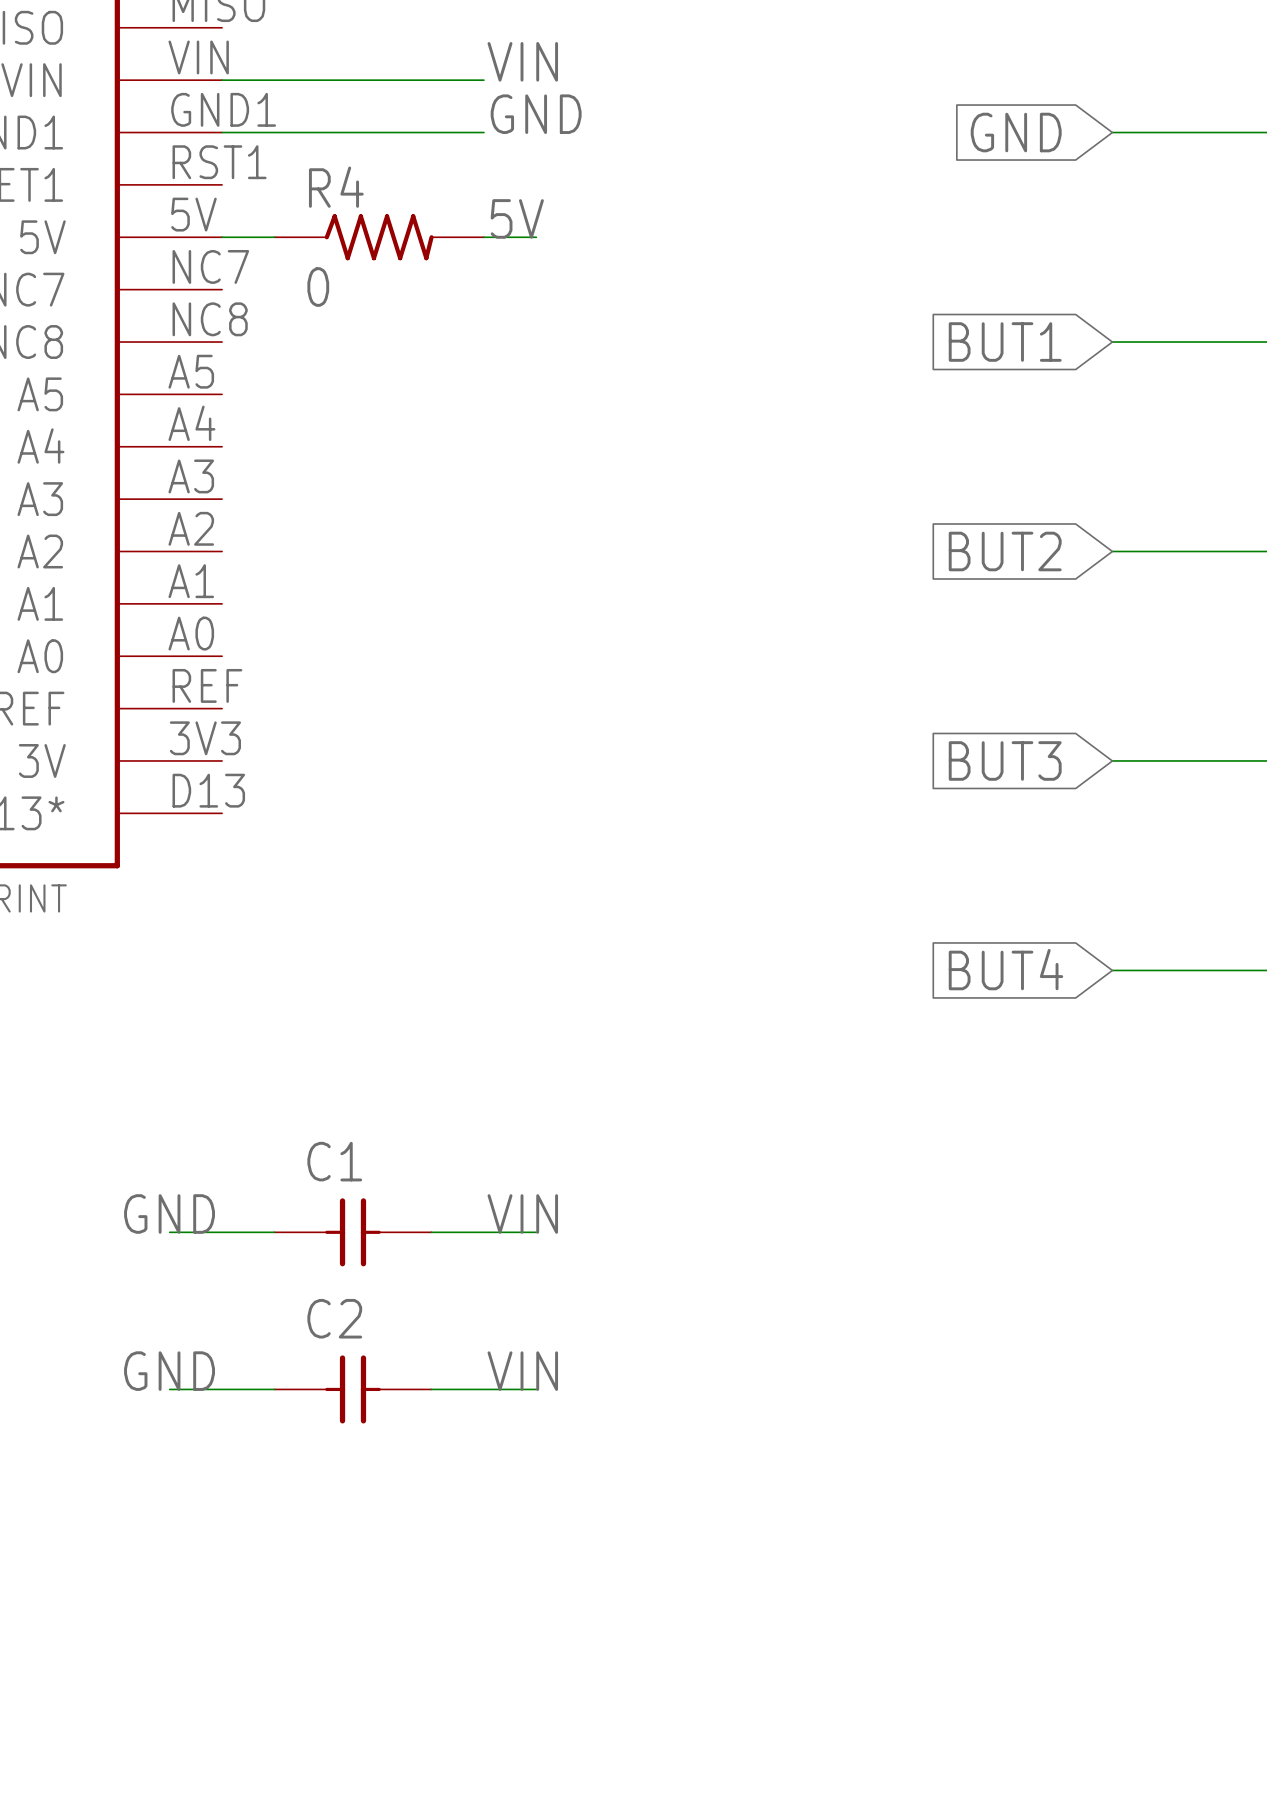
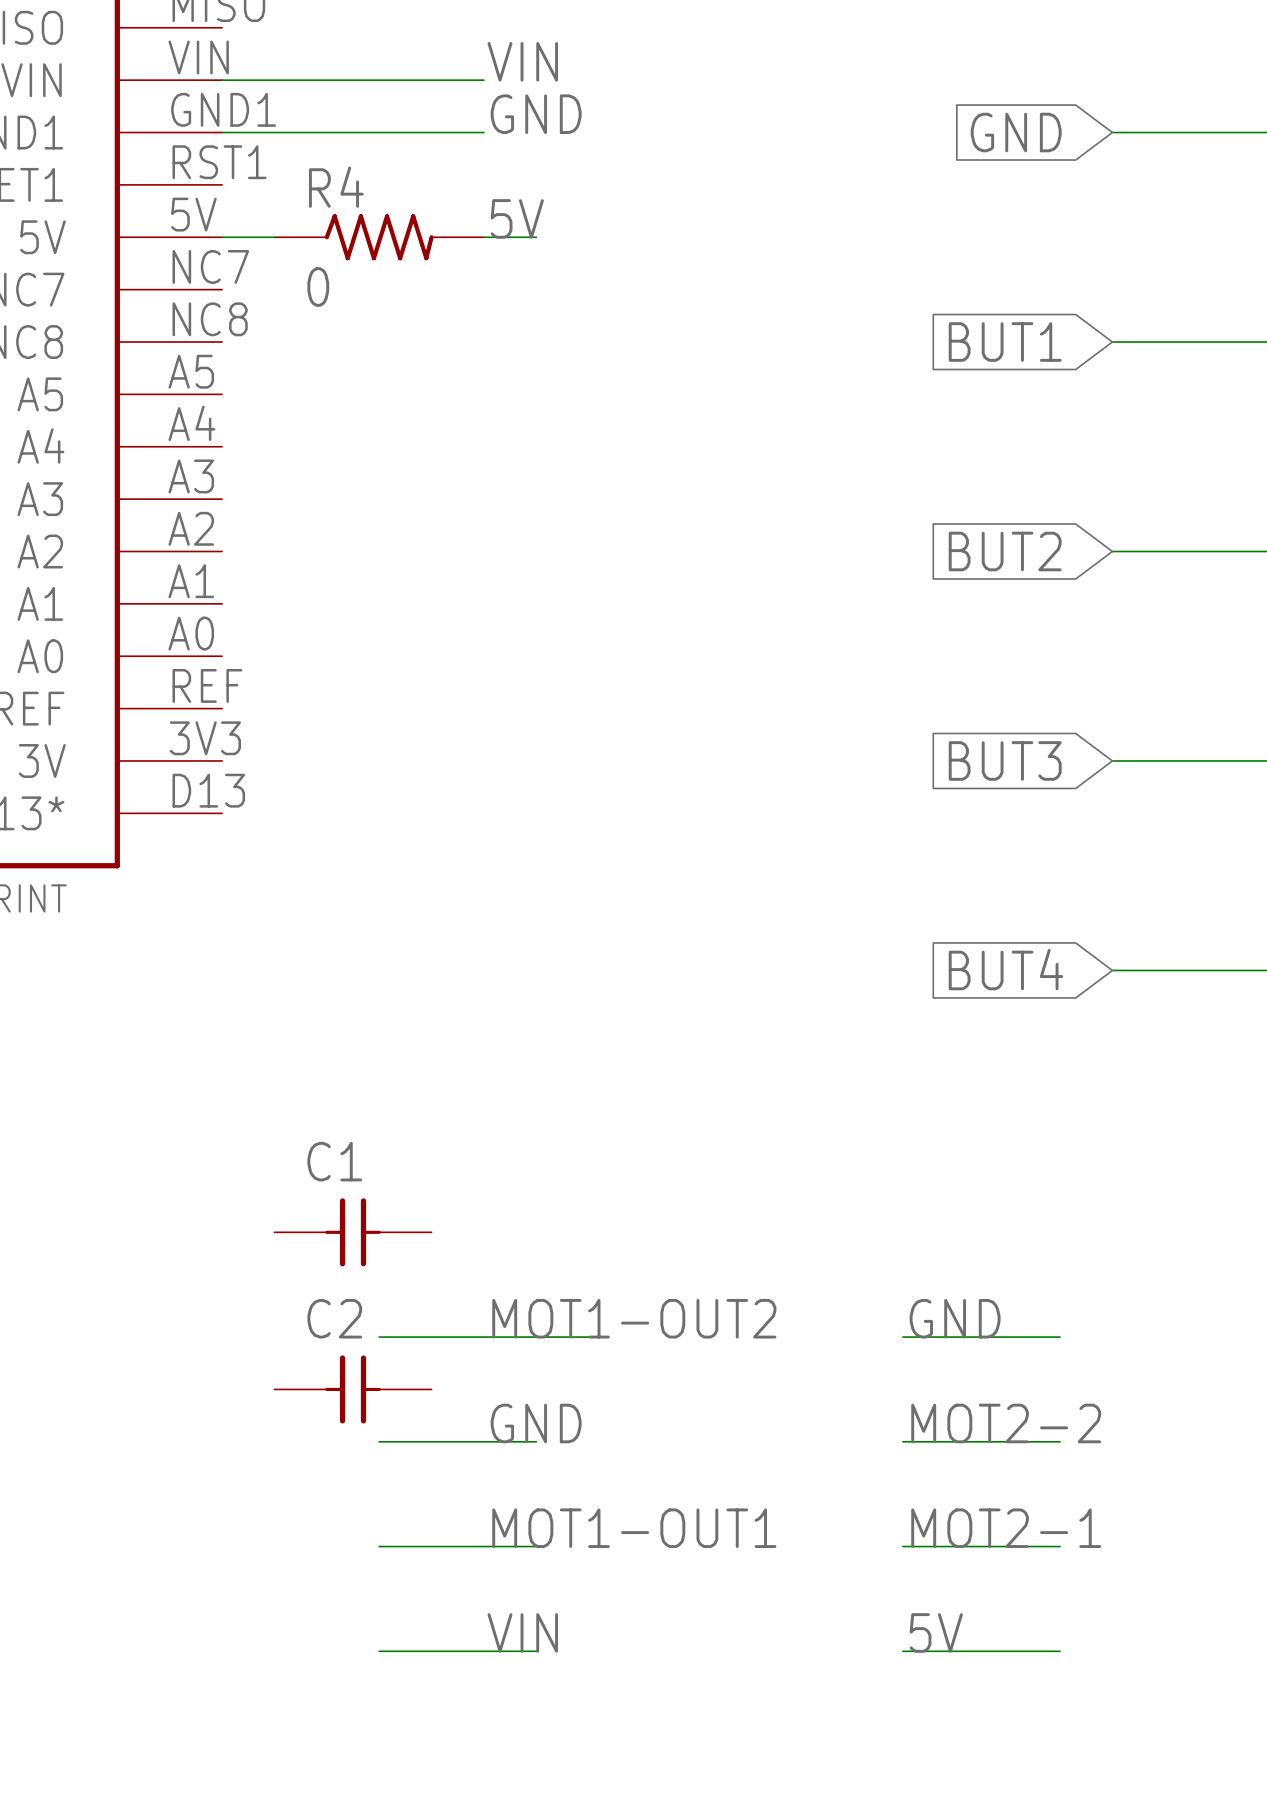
label: GND (169, 1213) -> none
label: VIN (522, 1213) -> none
wire: (169, 1232) (274, 1232) -> none
wire: (431, 1232) (536, 1232) -> none
label: none -> MOT1-OUT2 (634, 1318)
label: none -> GND (955, 1318)
wire: none -> (379, 1337) (588, 1337)
wire: none -> (902, 1337) (1060, 1337)
label: GND (169, 1371) -> none
label: VIN (522, 1371) -> none
wire: (169, 1389) (274, 1389) -> none
wire: (431, 1389) (536, 1389) -> none
label: none -> GND (536, 1423)
label: none -> MOT2-2 (1006, 1423)
wire: none -> (379, 1441) (536, 1441)
wire: none -> (902, 1441) (1060, 1441)
label: none -> MOT1-OUT1 (634, 1528)
label: none -> MOT2-1 (1006, 1528)
wire: none -> (379, 1546) (536, 1546)
wire: none -> (902, 1546) (1060, 1546)
label: none -> VIN (522, 1632)
label: none -> 5V (936, 1632)
wire: none -> (379, 1651) (536, 1651)
wire: none -> (902, 1651) (1060, 1651)

